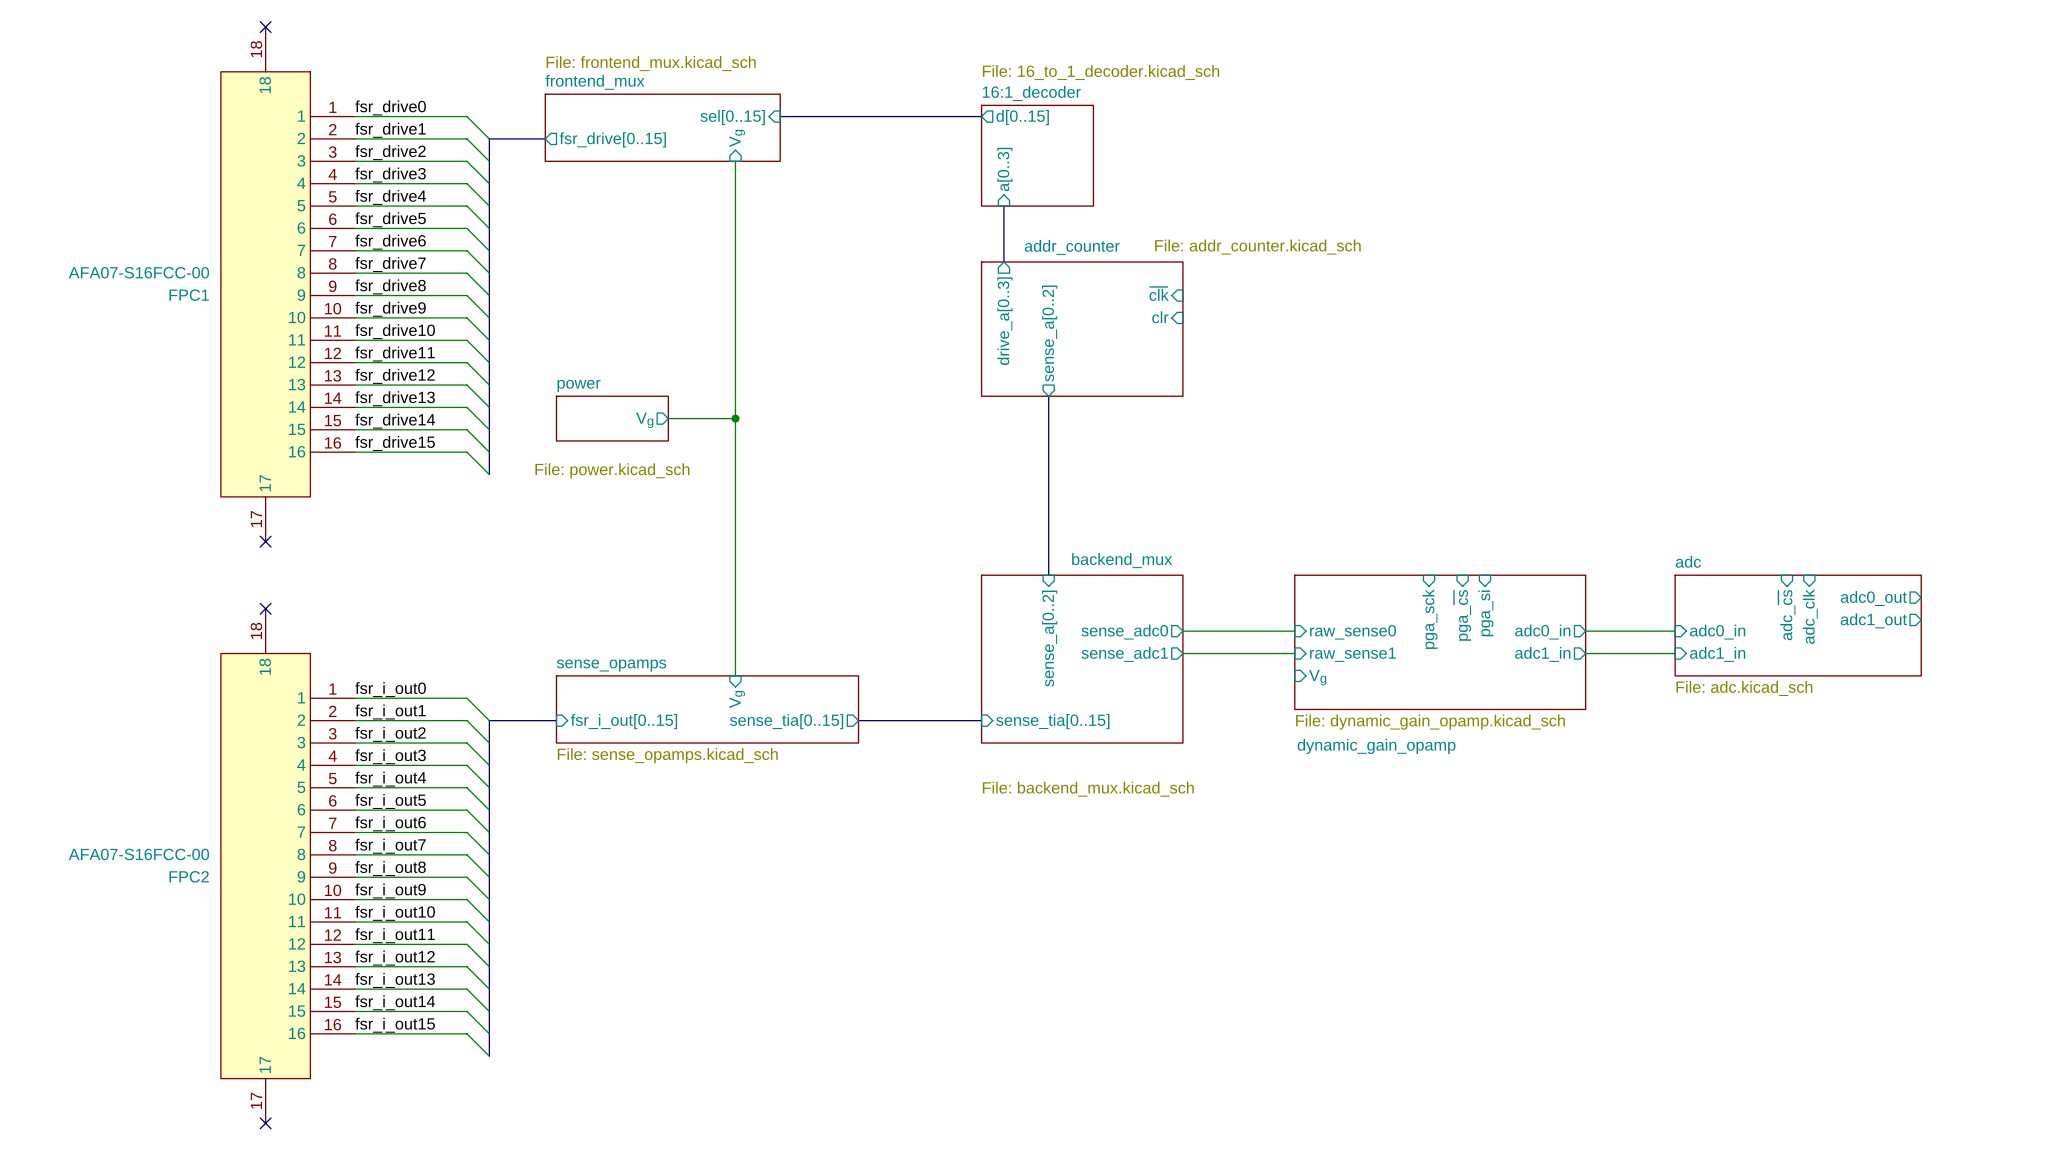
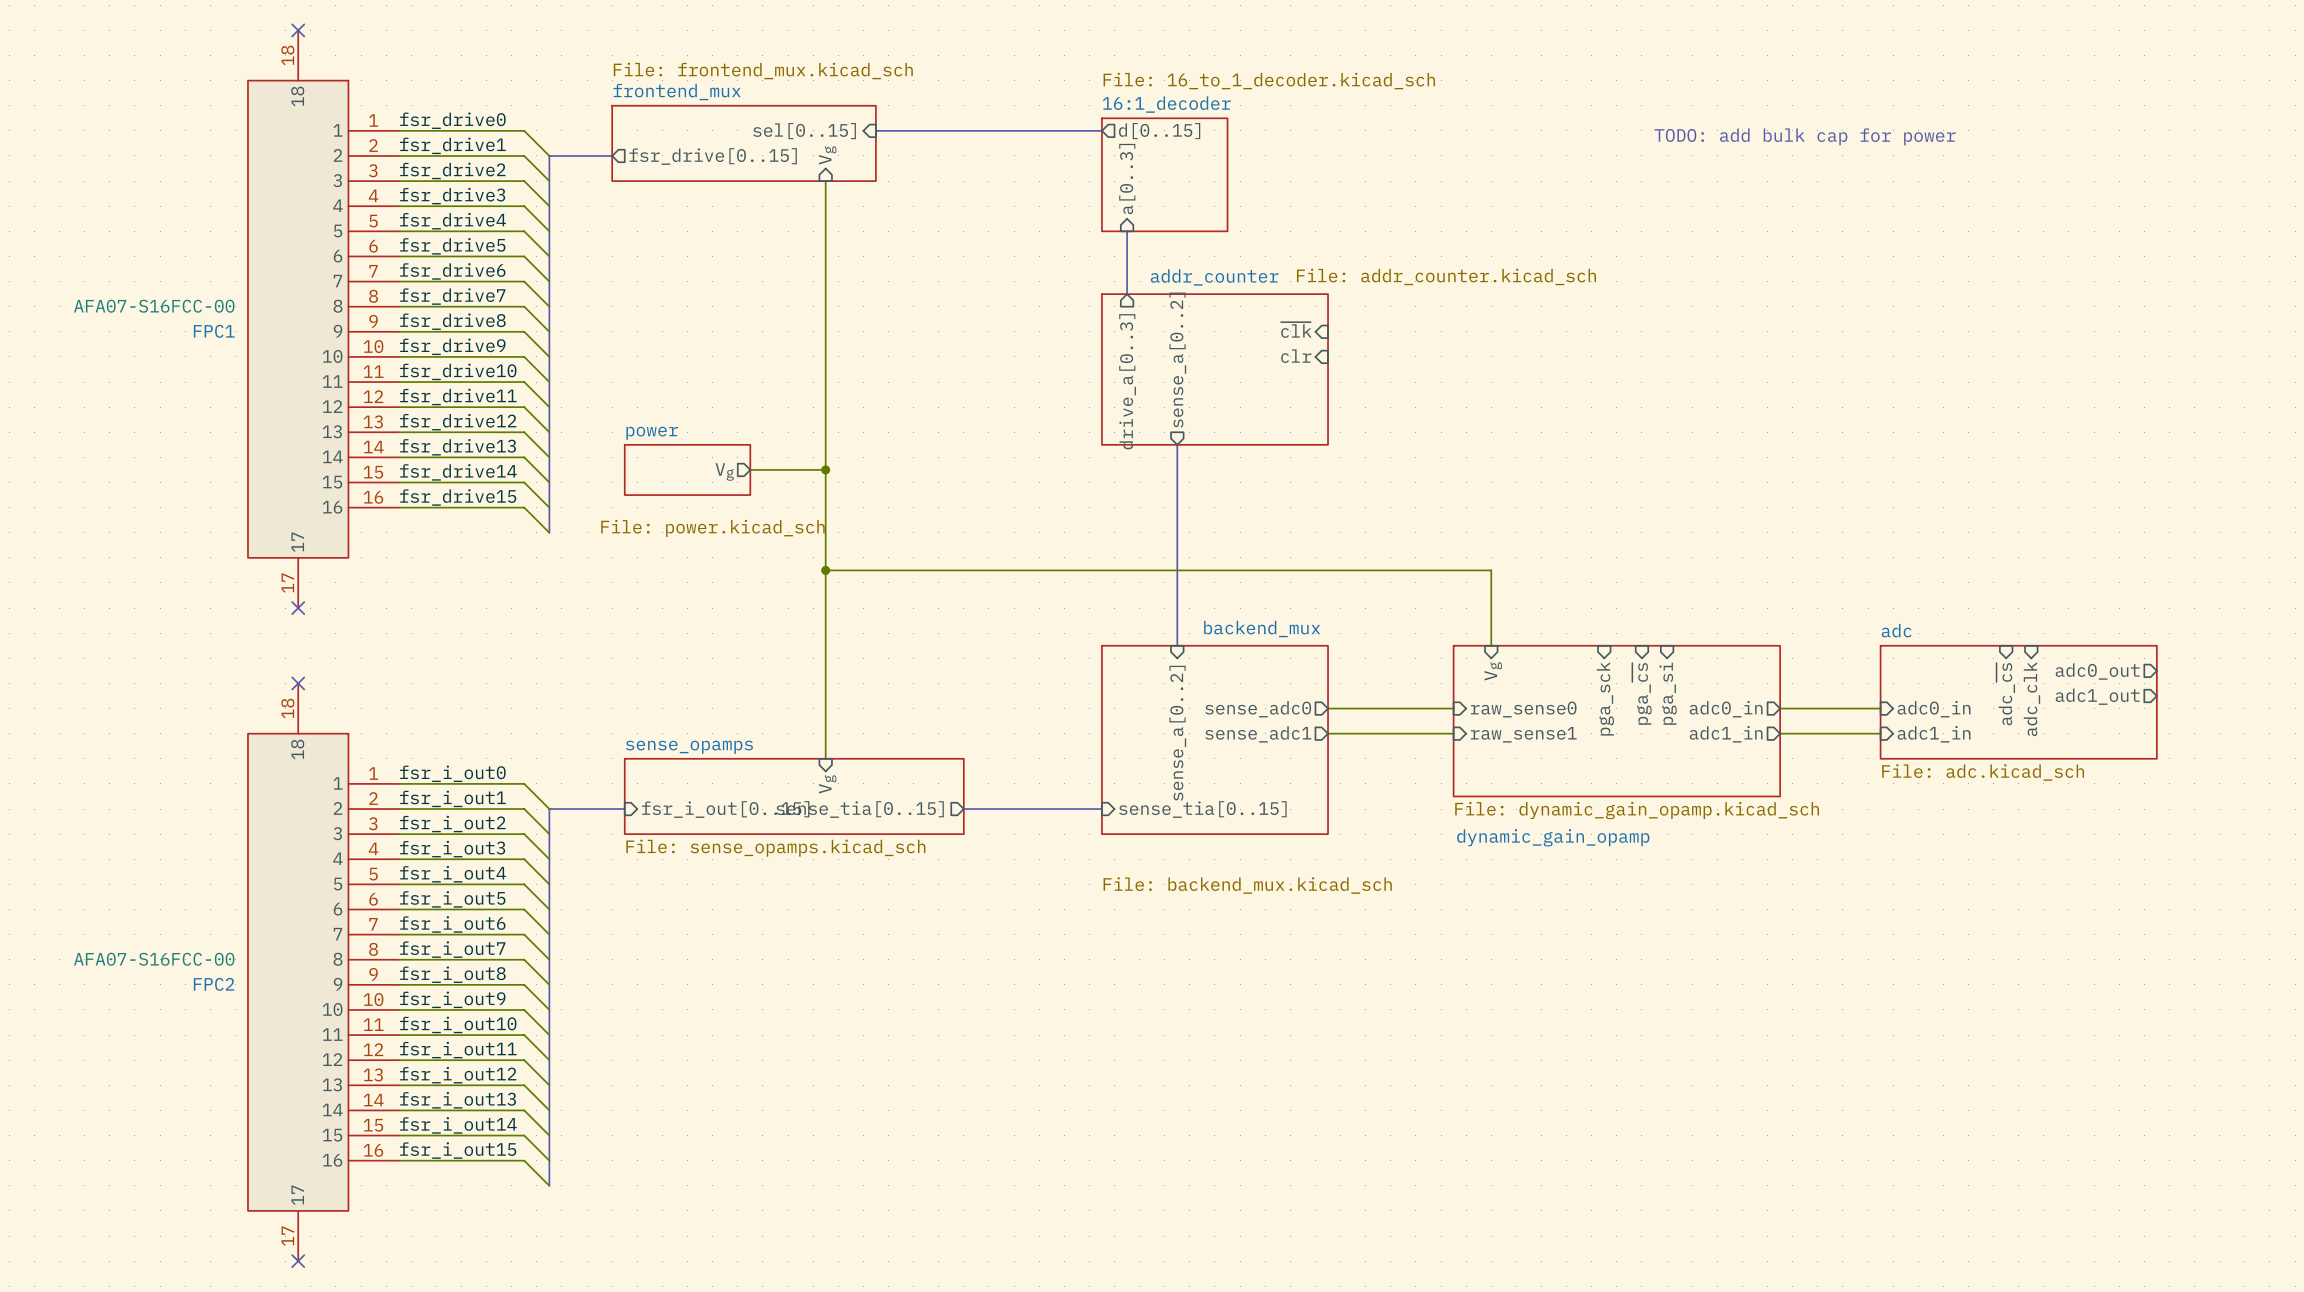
text: none -> TODO: add bulk cap for power (1805, 136)
wire: none -> (825, 570) (1491, 570) (1491, 645)
junction: none -> (825, 570)
sheet pin rotation: 0° (1317, 677) -> 90° clockwise (1493, 671)
sheet pin position: Vg (1317, 677) -> Vg (1493, 671)

